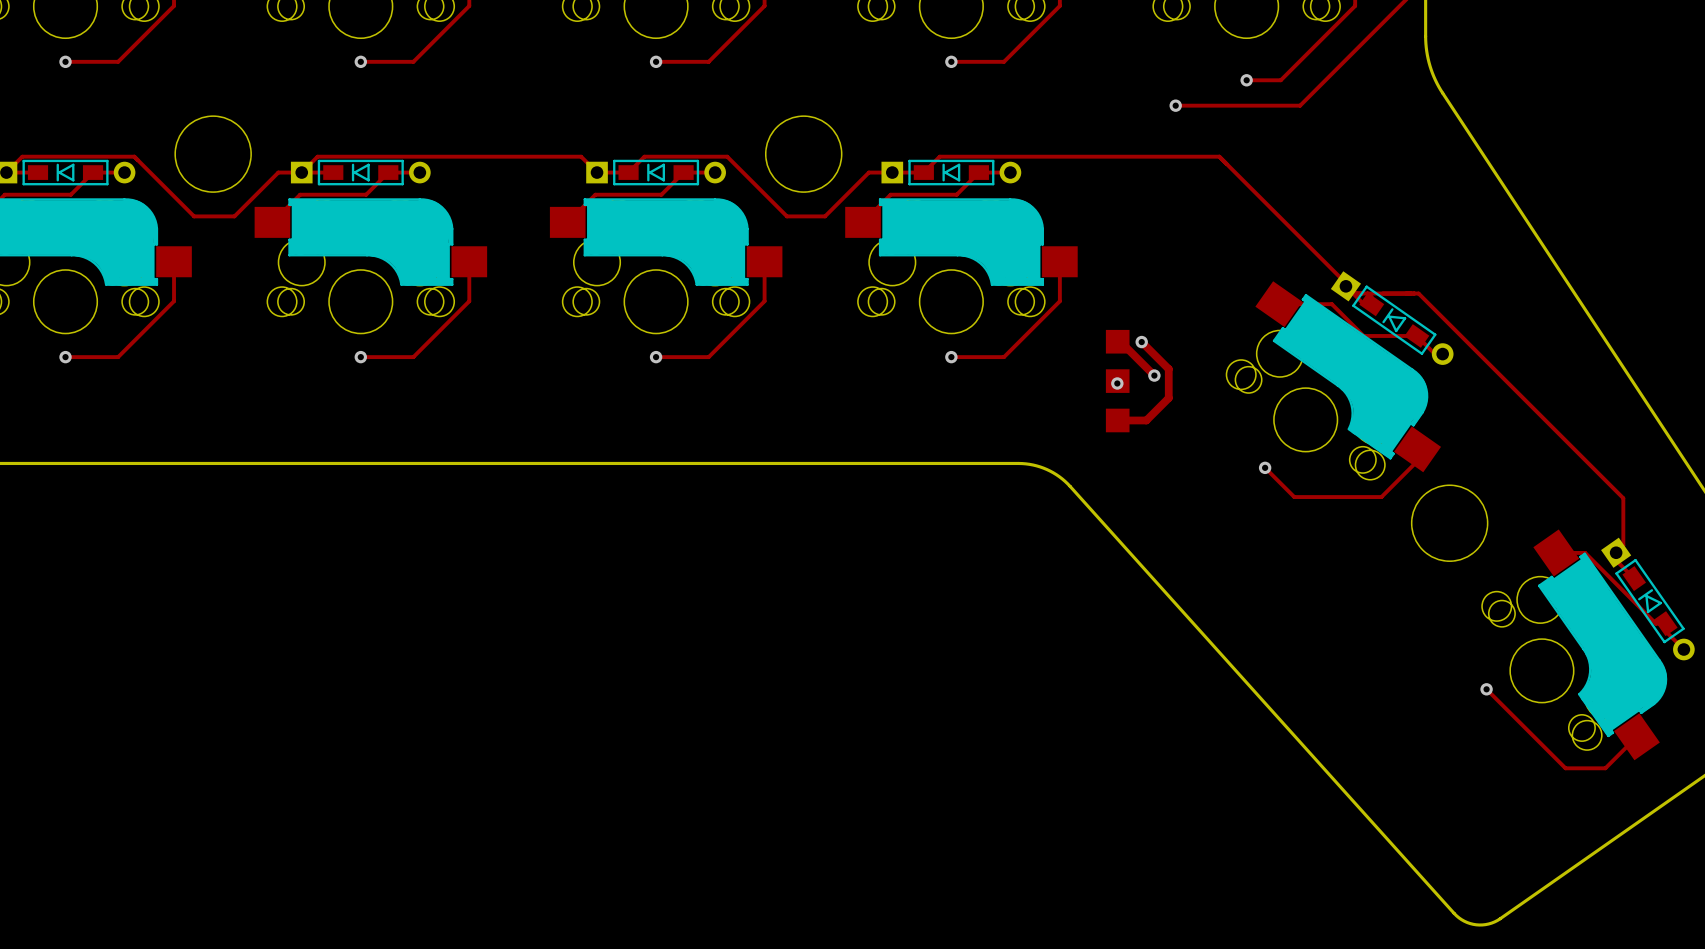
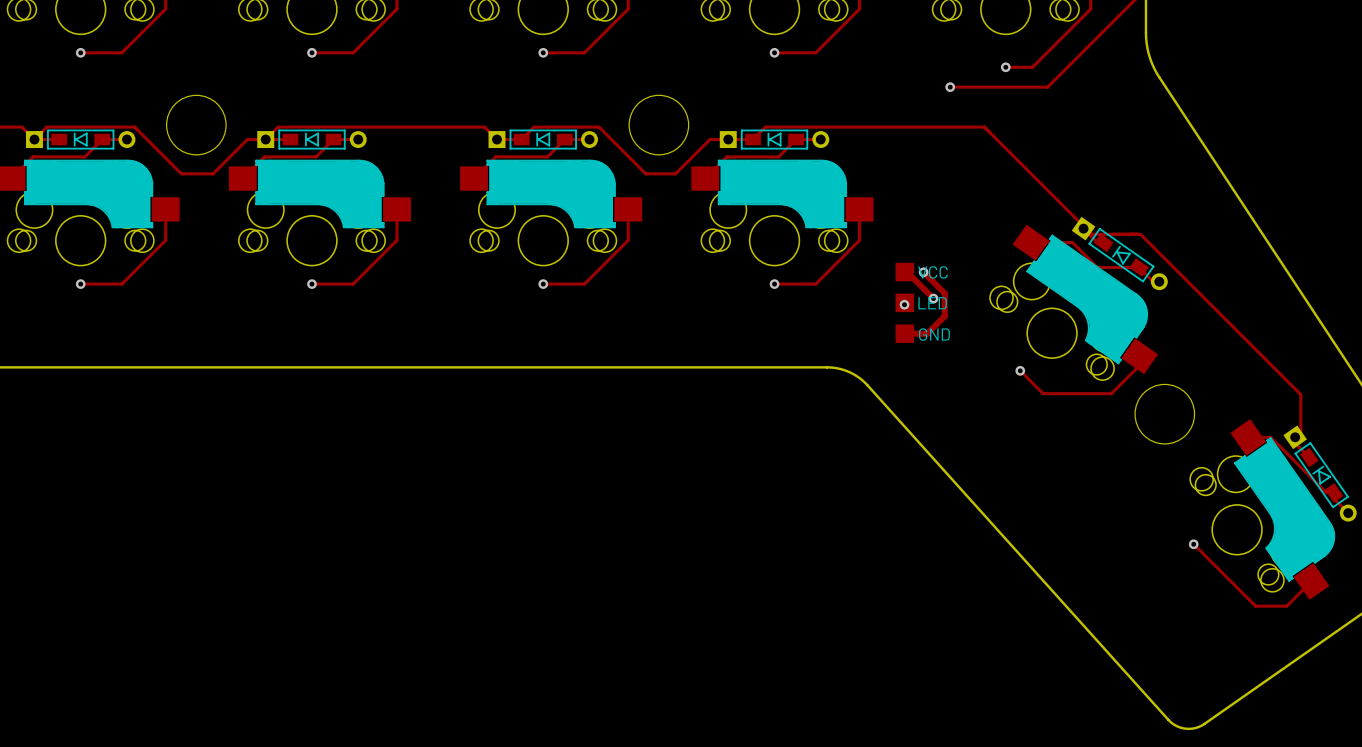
text: none -> VCC (932, 272)
text: none -> LED (932, 303)
text: none -> GND (934, 334)

